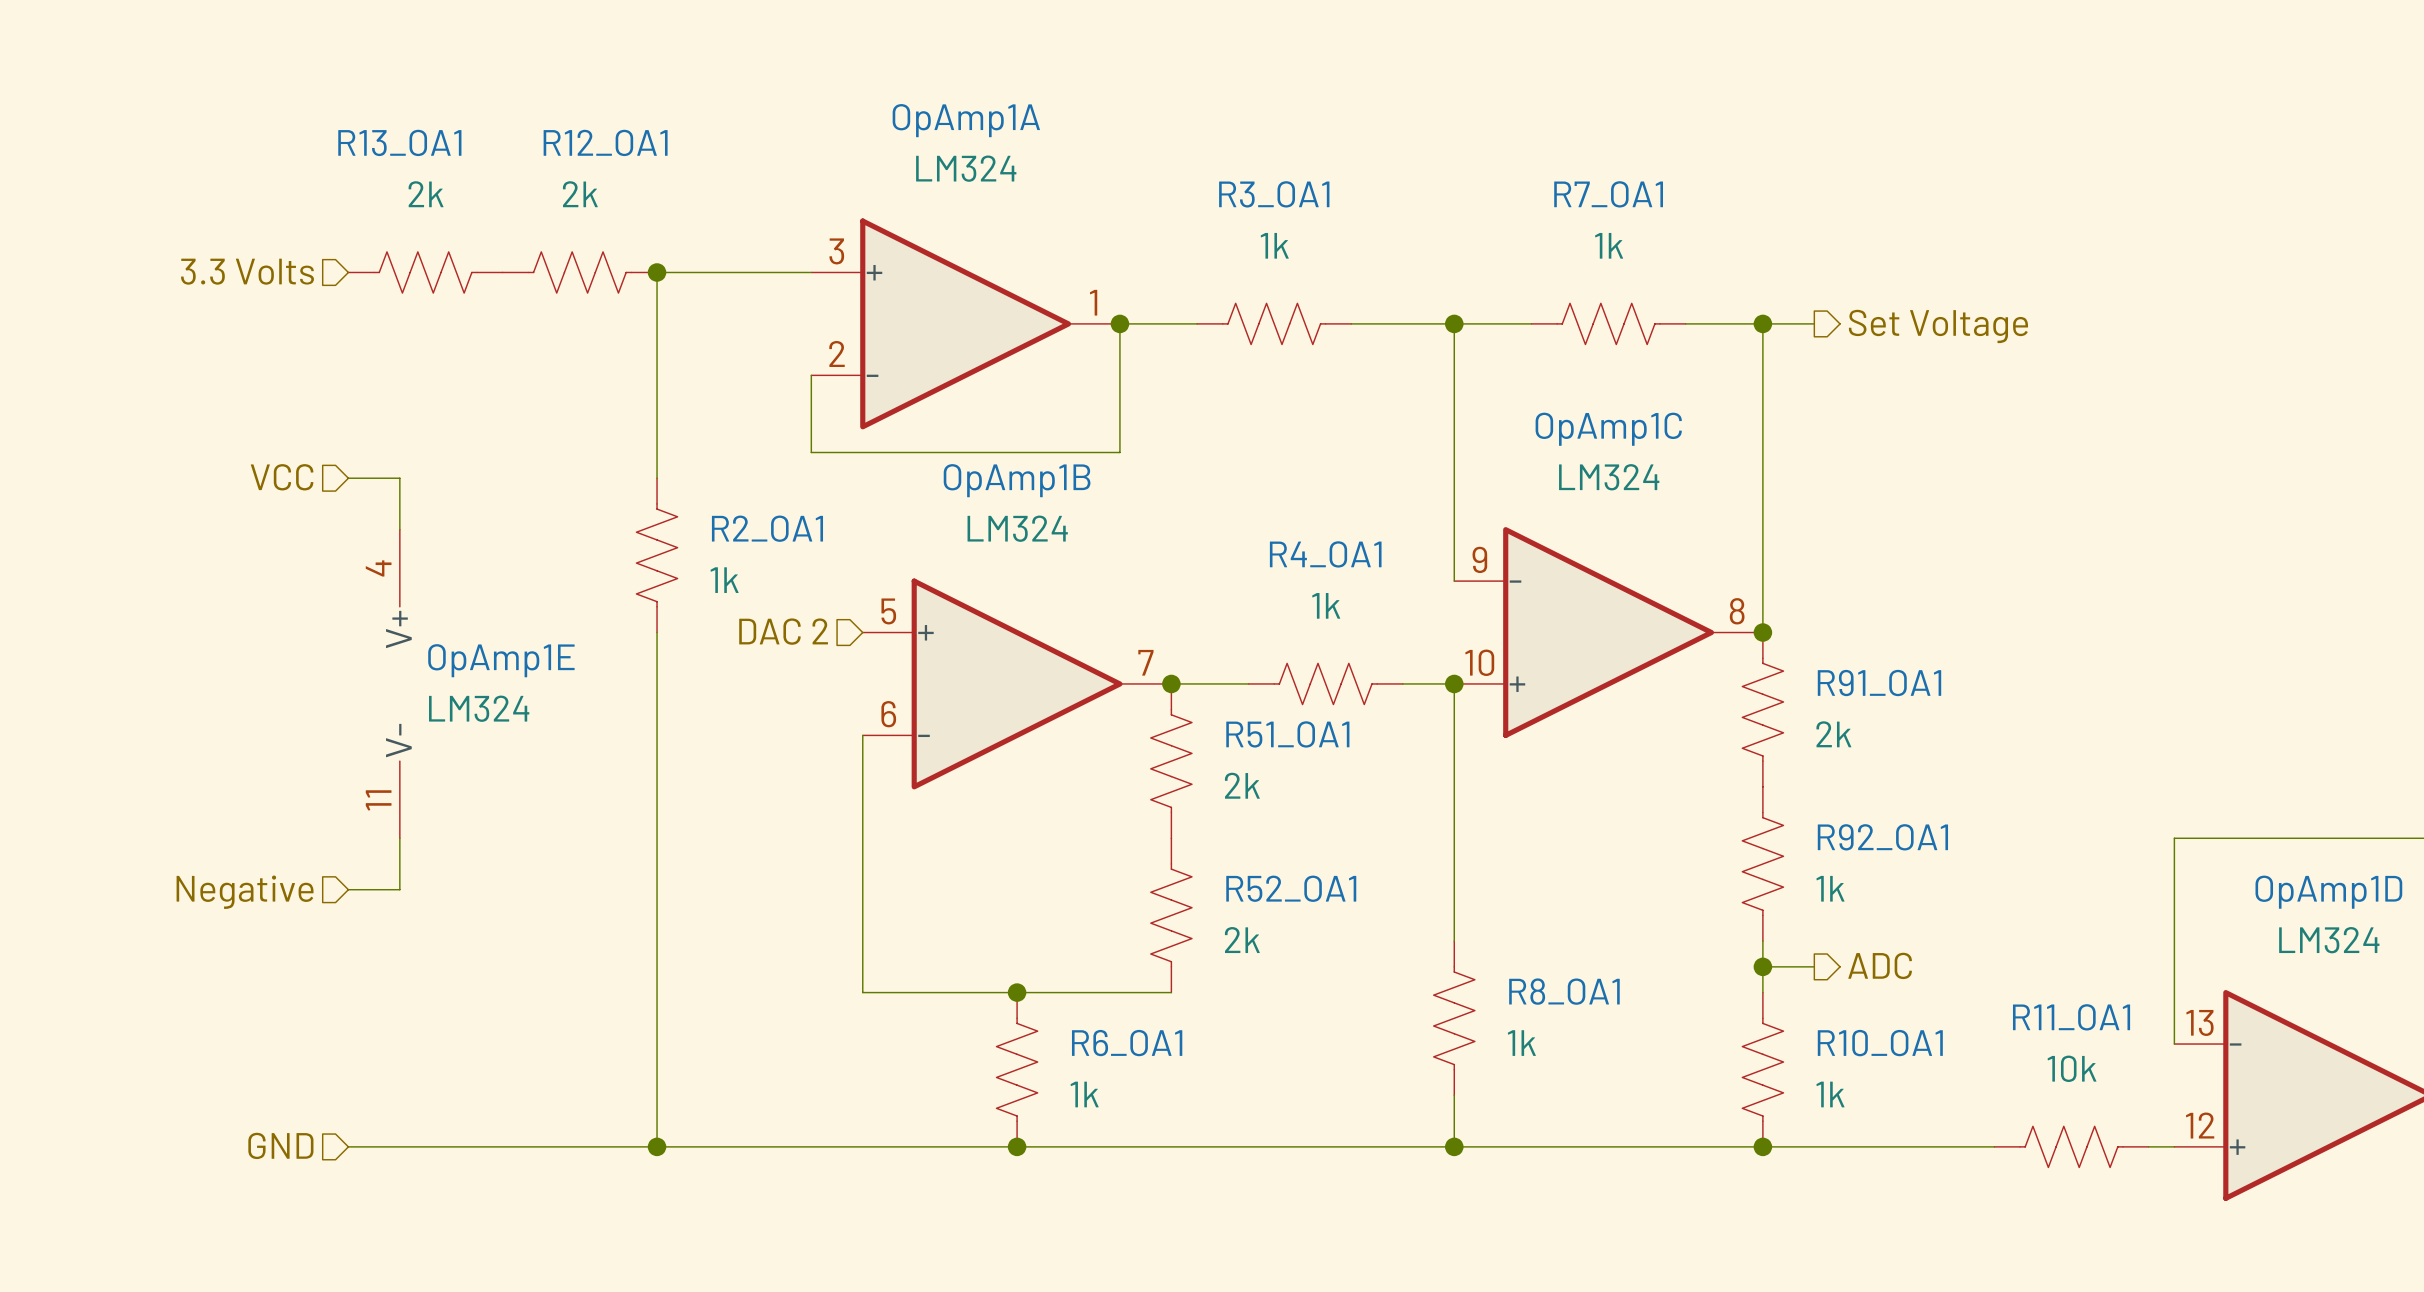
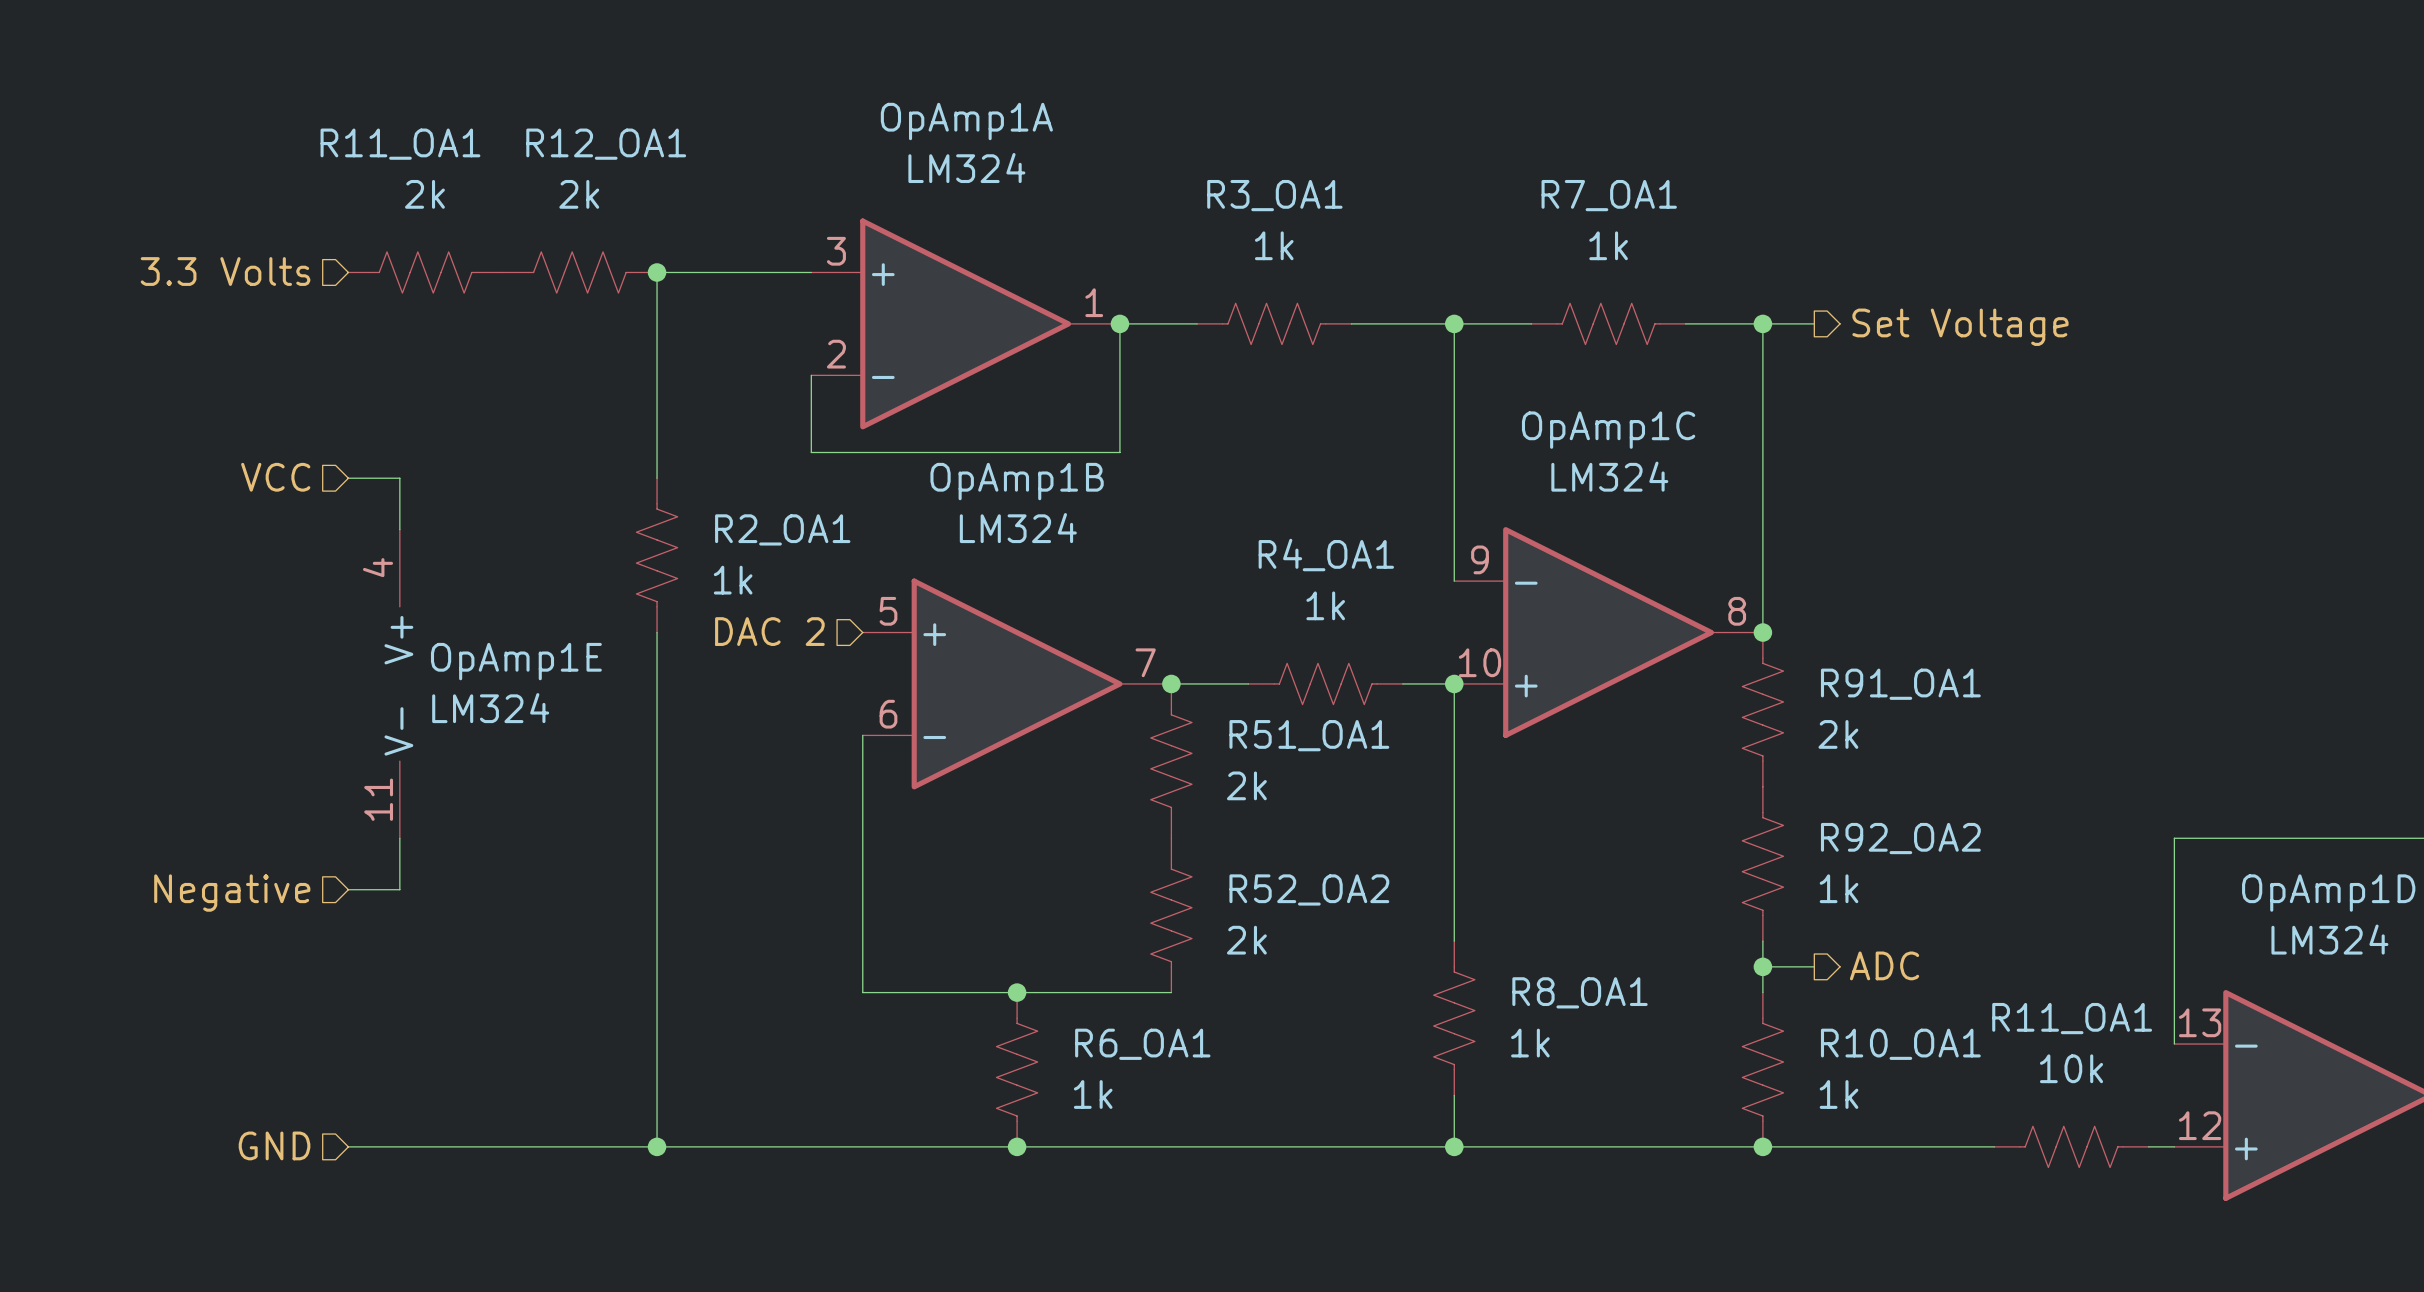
R13_OA1 name: R13_OA1 (399, 142) -> R11_OA1 (400, 144)
R92_OA1 name: R92_OA1 (1882, 837) -> R92_OA2 (1900, 838)
R52_OA1 name: R52_OA1 (1291, 888) -> R52_OA2 (1309, 889)

